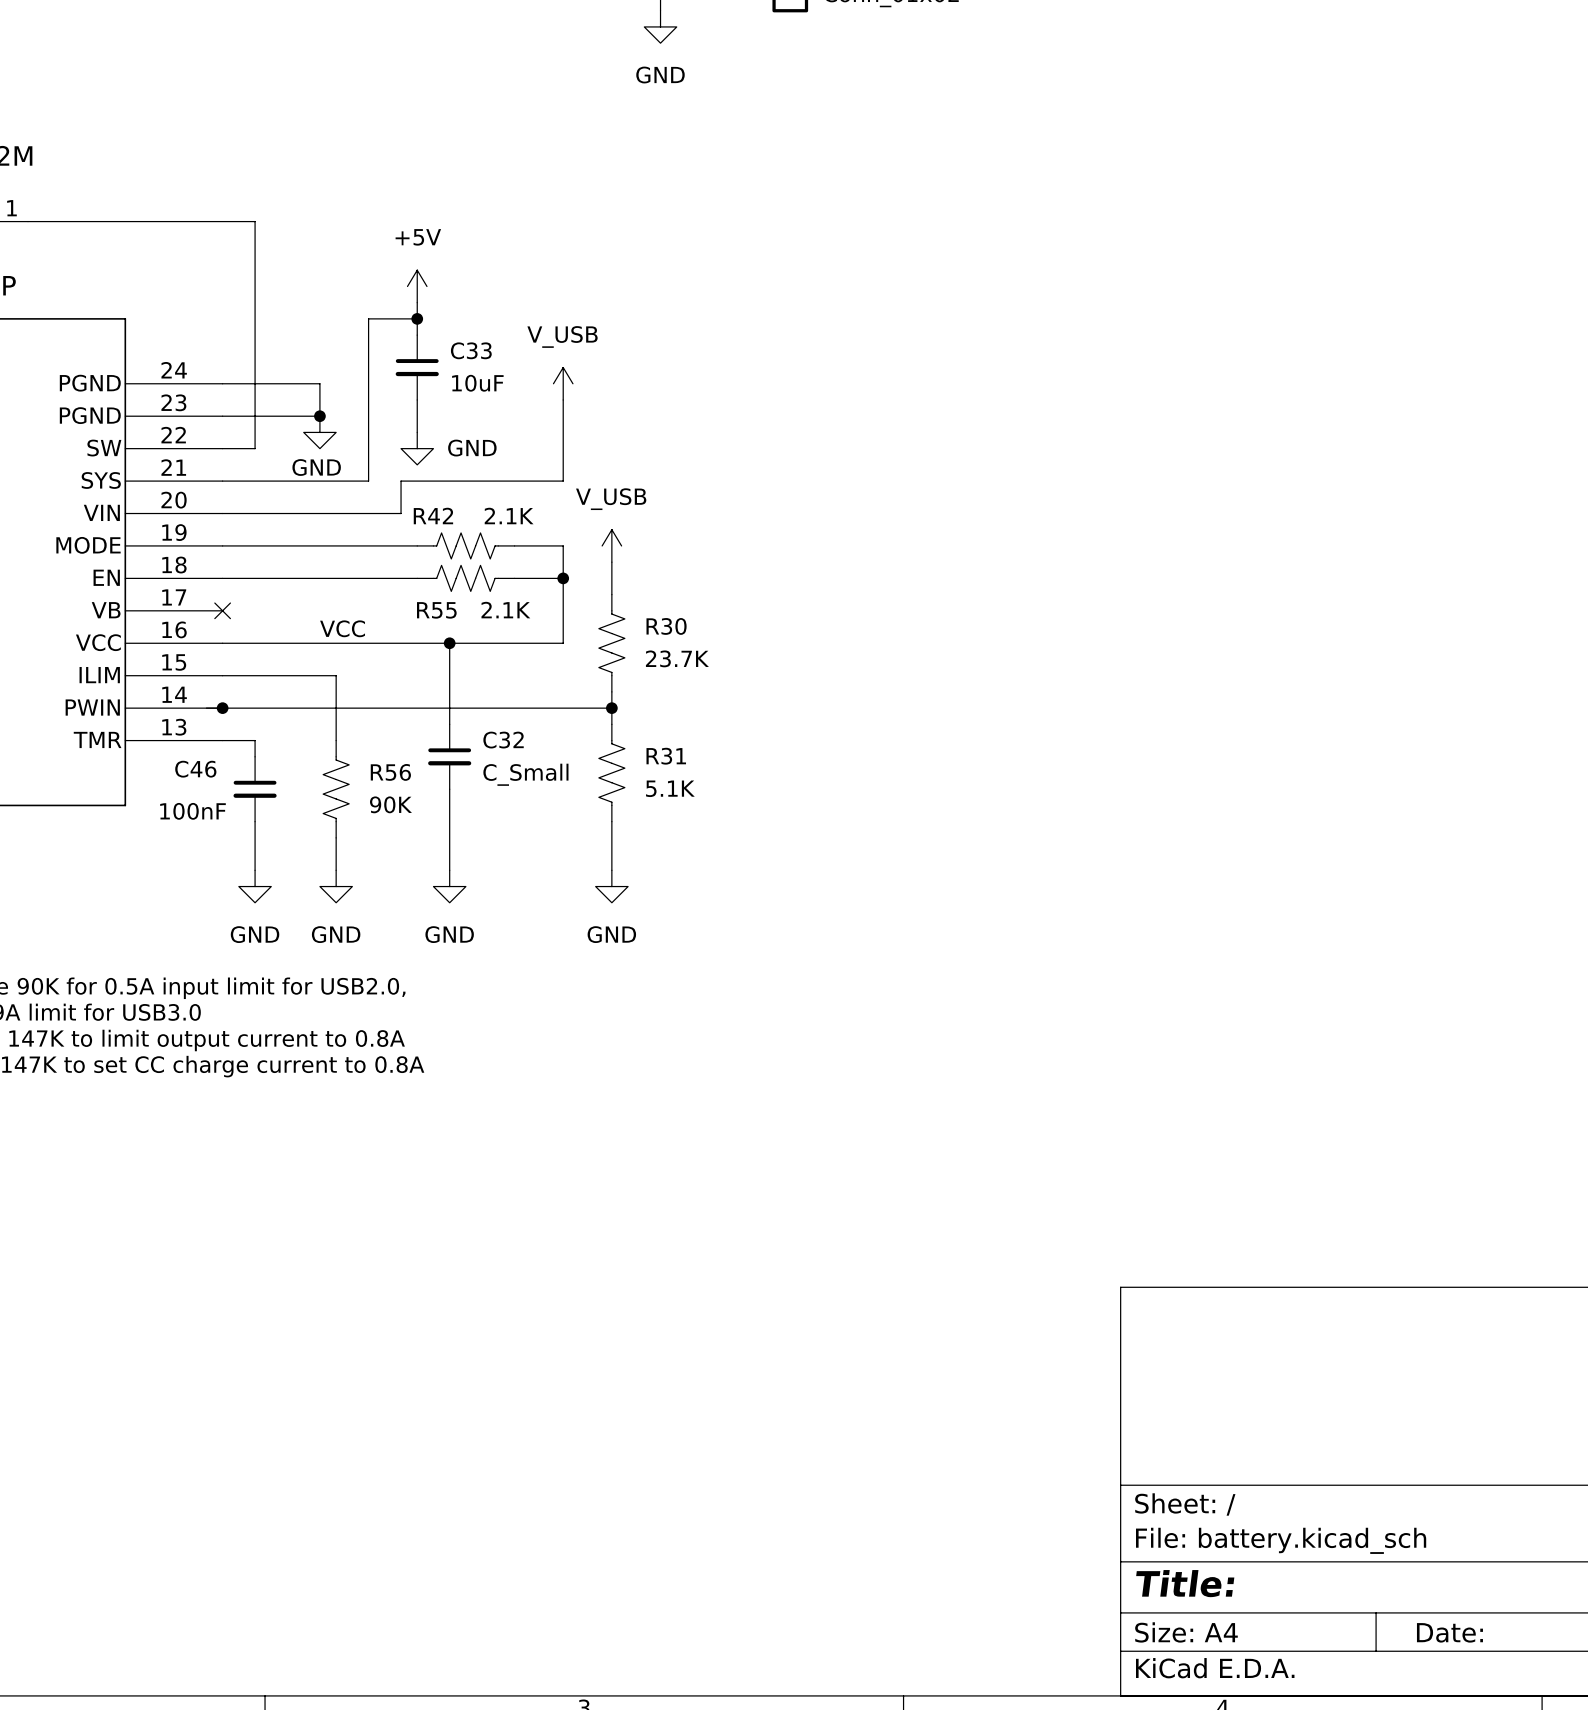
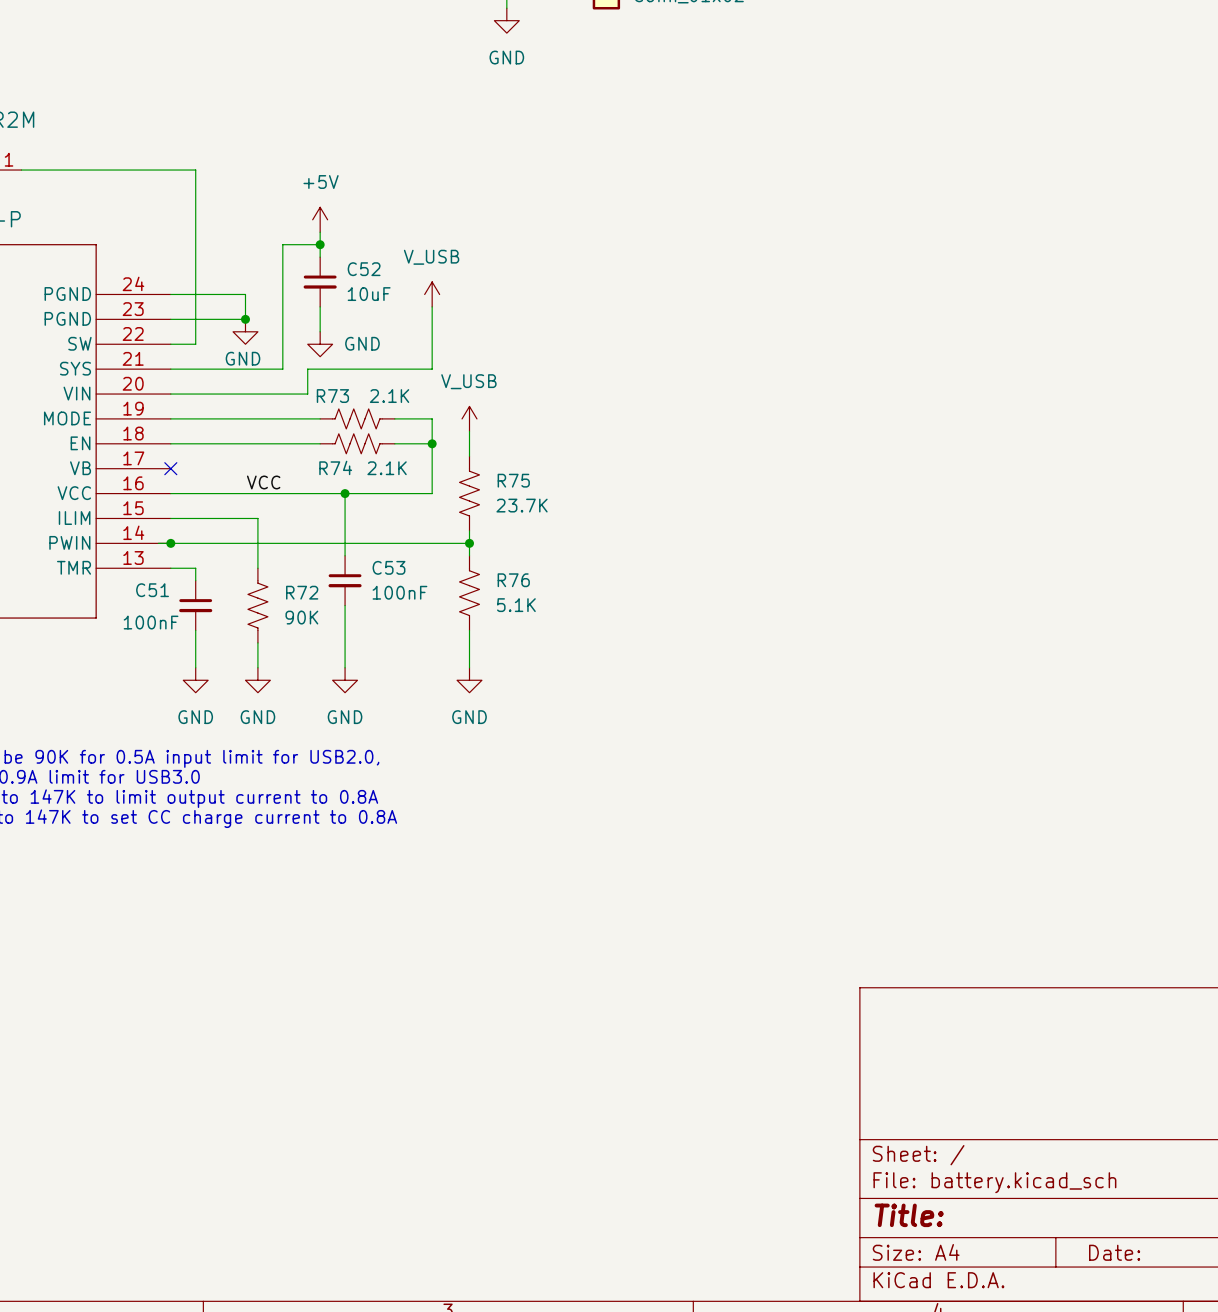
C33 name: C33 (471, 350) -> C52 (364, 269)
R42 name: R42 (433, 516) -> R73 (332, 396)
R55 name: R55 (436, 610) -> R74 (335, 467)
R30 name: R30 (666, 626) -> R75 (513, 480)
C32 name: C32 (503, 740) -> C53 (388, 567)
R31 name: R31 (666, 756) -> R76 (513, 580)
C46 name: C46 (195, 769) -> C51 (152, 590)
R56 name: R56 (390, 772) -> R72 (302, 592)
C32 value: C_Small (525, 774) -> 100nF (399, 592)

